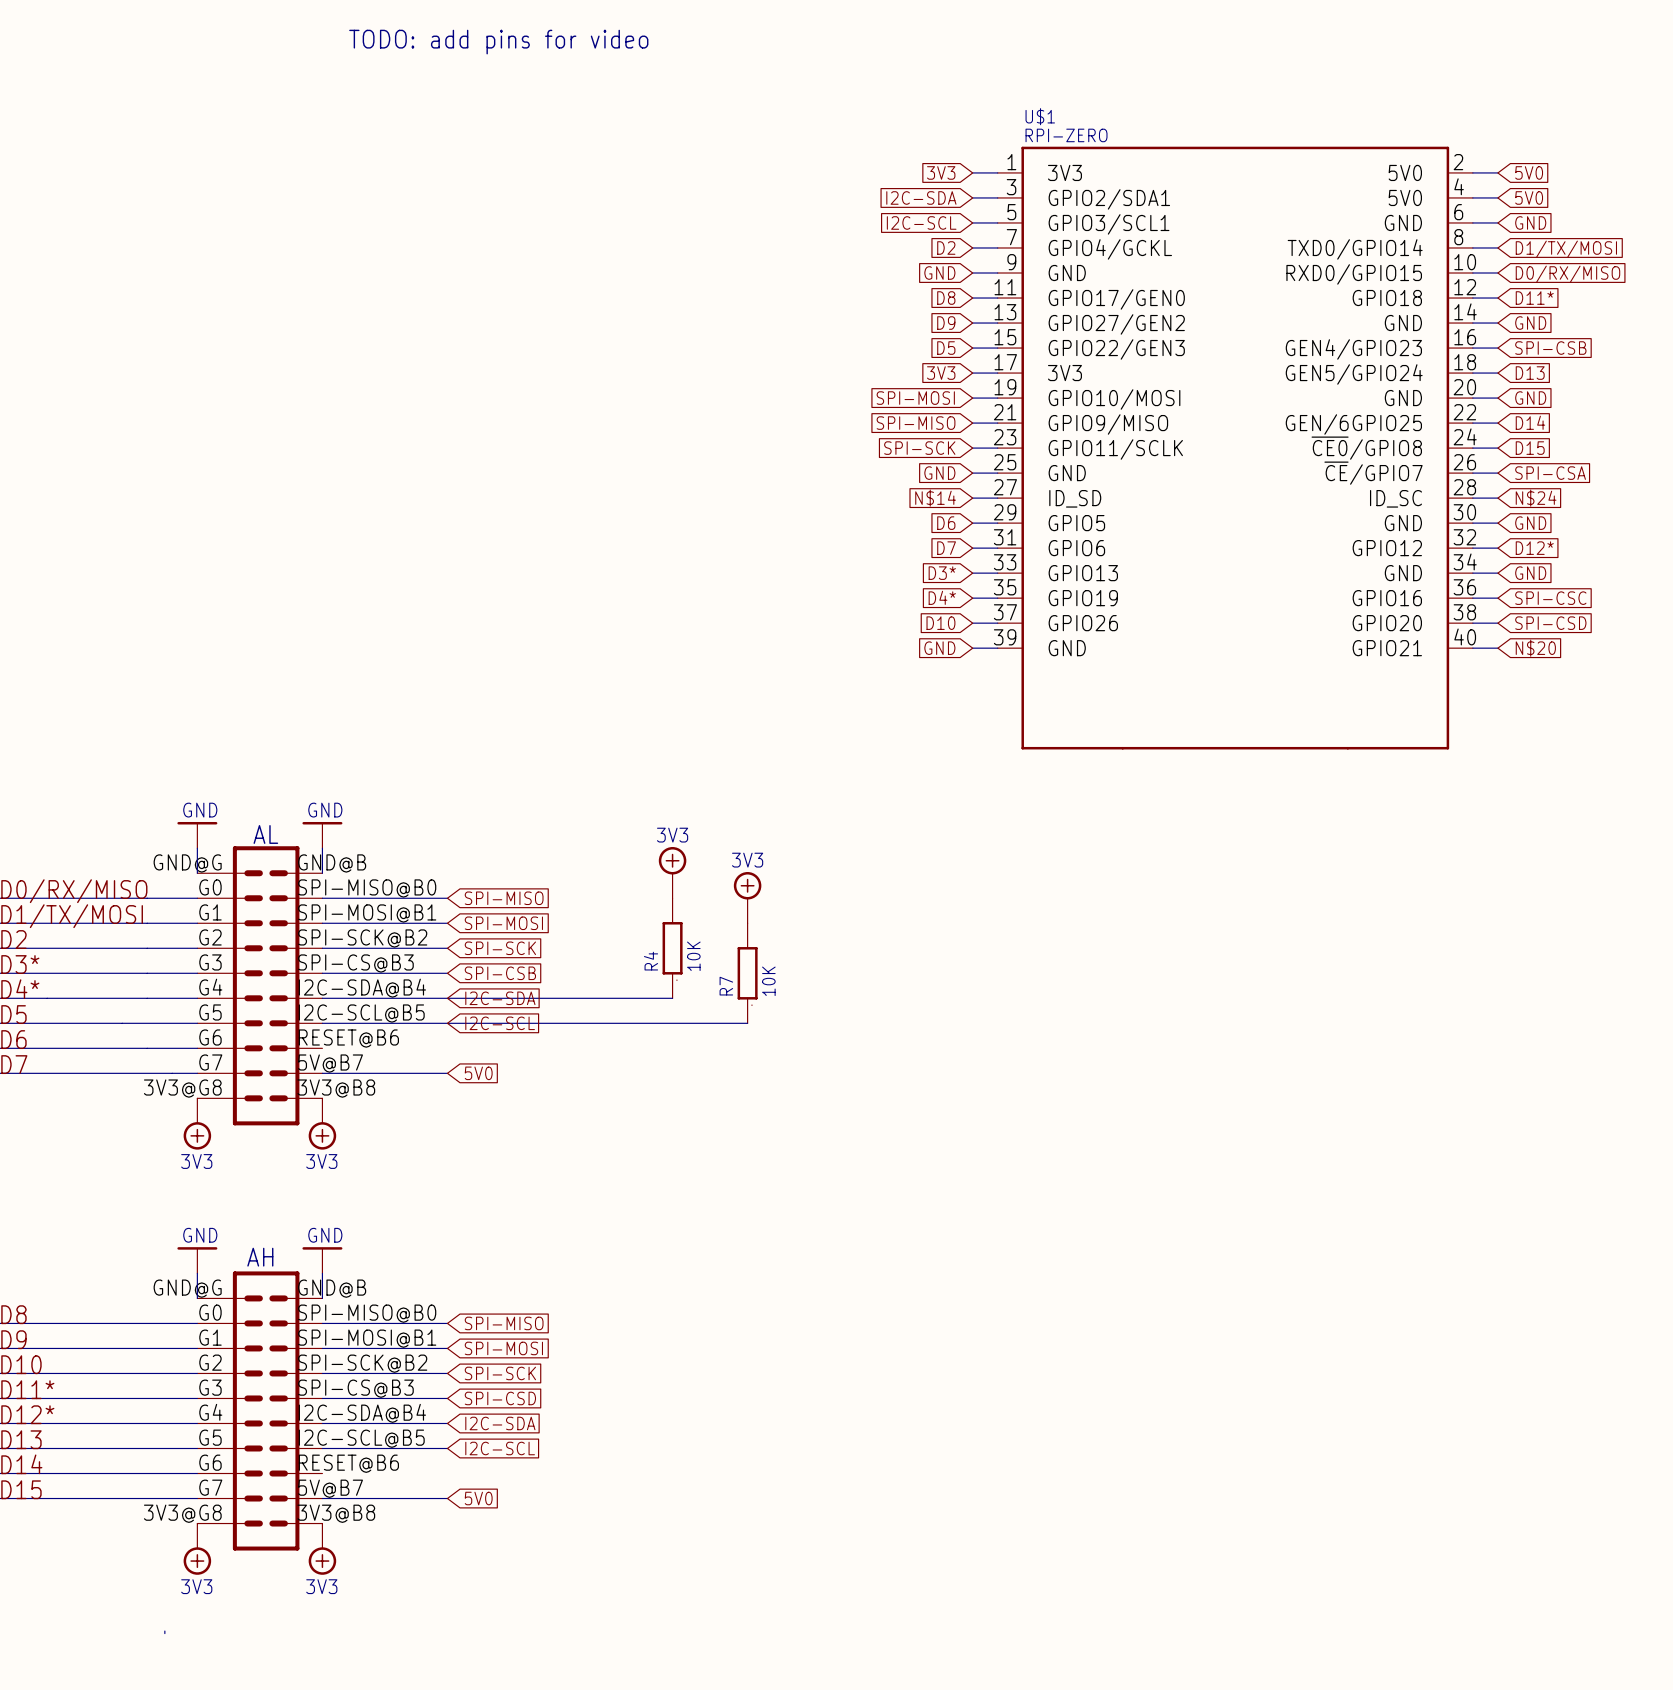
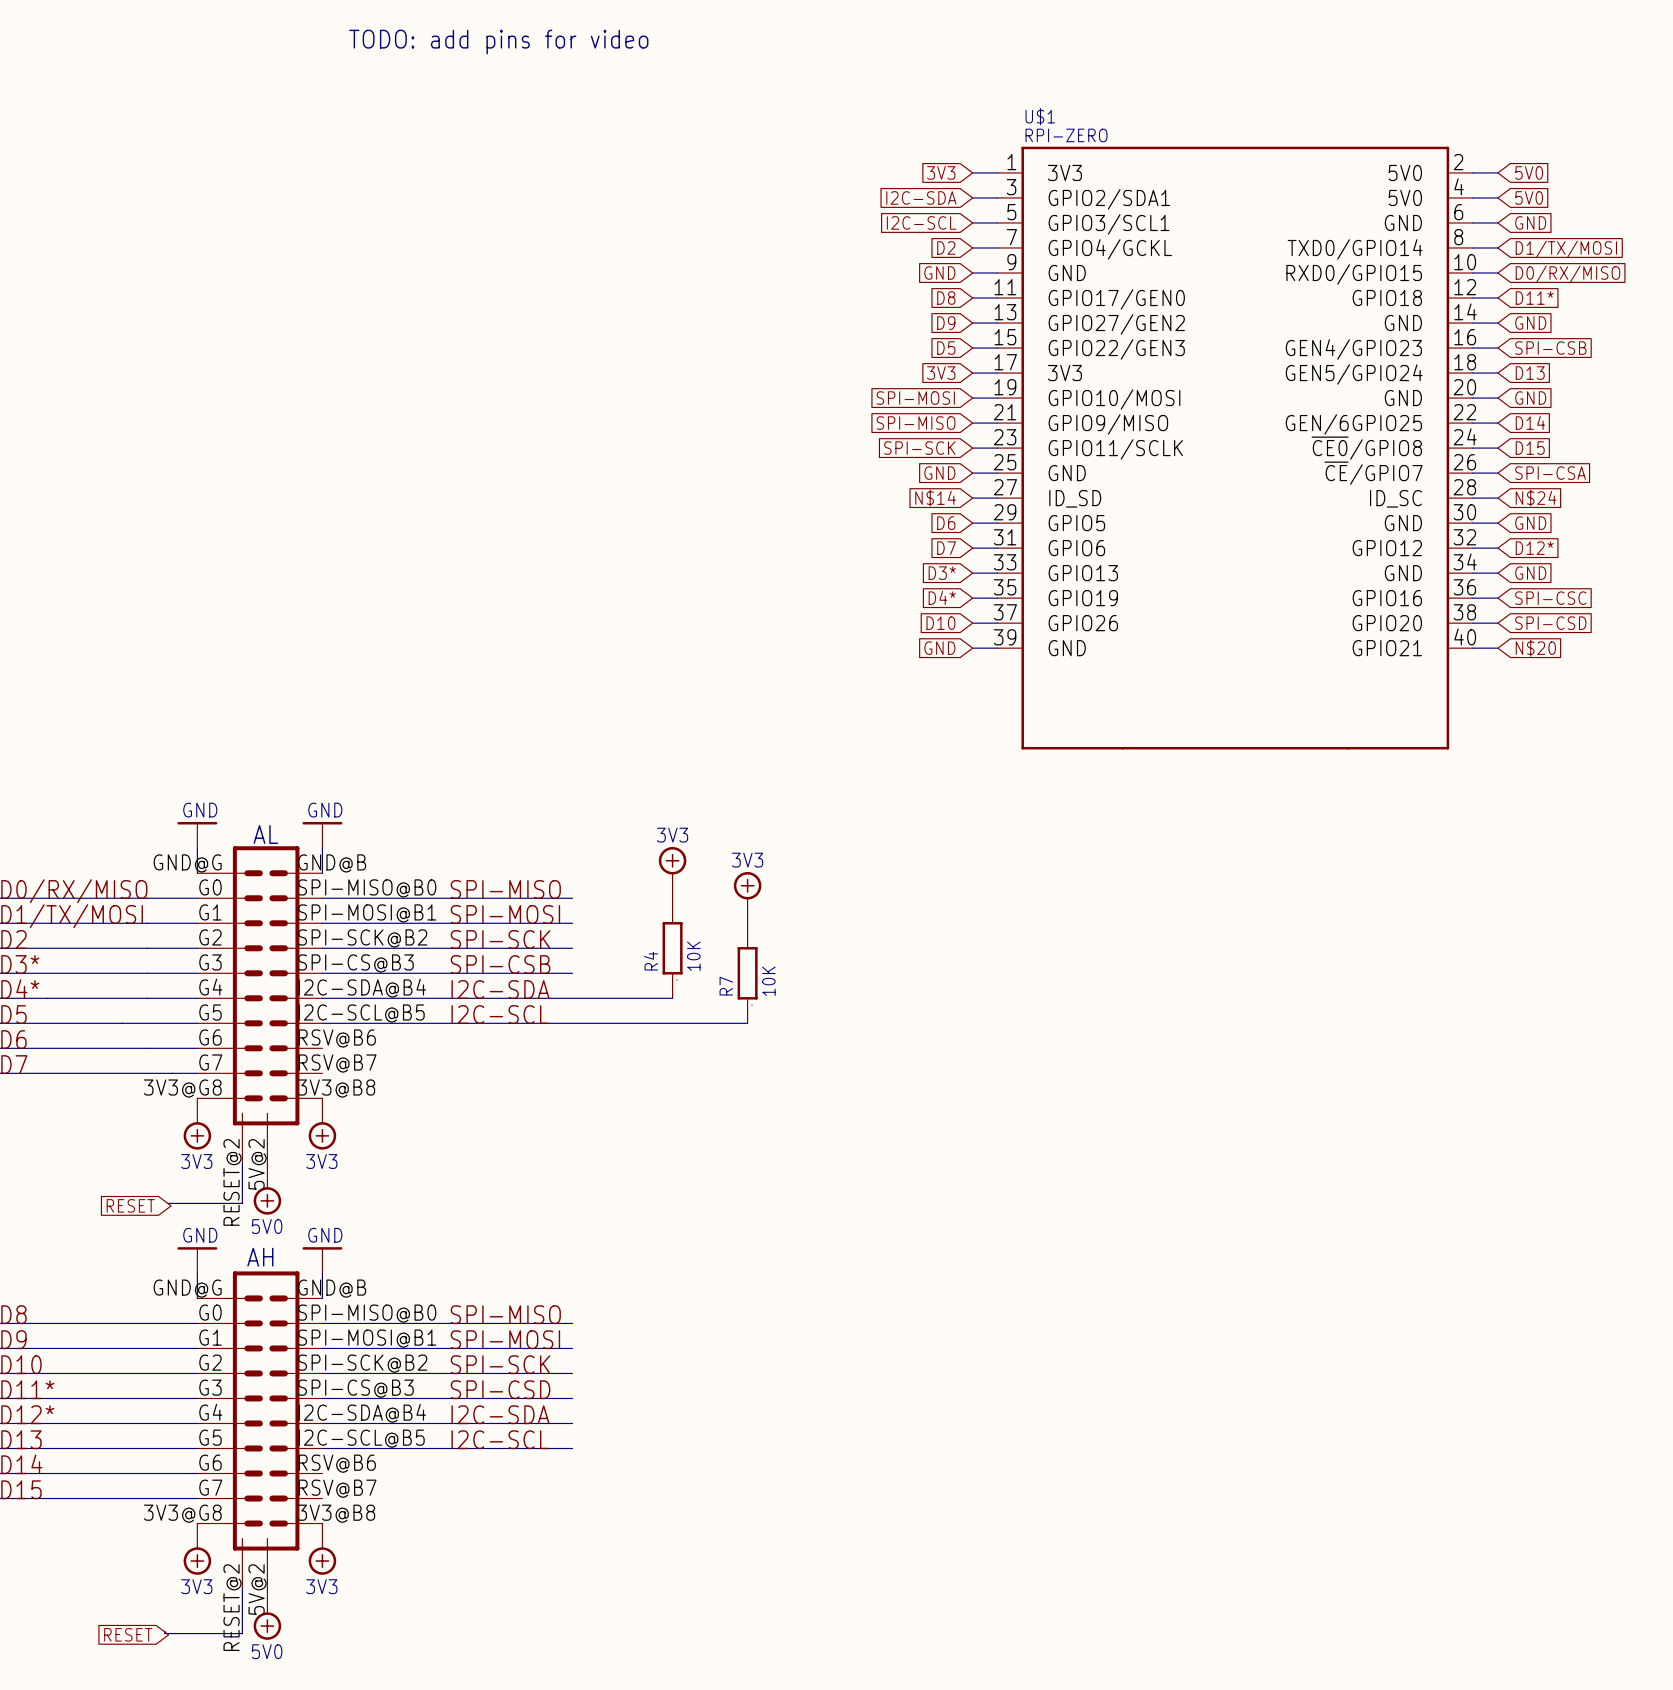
label: none -> SPI-MISO (505, 889)
wire: none -> (447, 898) (572, 898)
global label: SPI-MISO (504, 898) -> none
label: none -> SPI-MOSI (505, 914)
wire: none -> (447, 923) (572, 923)
global label: SPI-MOSI (503, 923) -> none
label: none -> SPI-SCK (500, 939)
wire: none -> (447, 948) (572, 948)
global label: SPI-SCK (500, 948) -> none
label: none -> SPI-CSB (500, 964)
global label: SPI-CSB (500, 973) -> none
AL: (259, 985) -> none
label: none -> I2C-SDA (500, 989)
global label: I2C-SDA (500, 998) -> none
AL: none -> (259, 1004)
label: none -> I2C-SCL (500, 1014)
global label: I2C-SCL (500, 1023) -> none
wire: (322, 1073) (447, 1073) -> (447, 973) (572, 973)
global label: 5V0 (478, 1073) -> none
wire: none -> (242, 1163) (242, 1203) (167, 1203)
power symbol: none -> 5V0 (267, 1189)
global label: none -> RESET (130, 1205)
label: none -> SPI-MISO (505, 1314)
wire: none -> (447, 1323) (572, 1323)
global label: SPI-MISO (504, 1323) -> none
label: none -> SPI-MOSI (505, 1339)
wire: none -> (447, 1348) (572, 1348)
global label: SPI-MOSI (503, 1348) -> none
label: none -> SPI-SCK (500, 1364)
wire: none -> (447, 1373) (572, 1373)
global label: SPI-SCK (500, 1373) -> none
label: none -> SPI-CSD (500, 1389)
global label: SPI-CSD (500, 1398) -> none
AH: (259, 1410) -> none
label: none -> I2C-SDA (500, 1414)
wire: none -> (447, 1423) (572, 1423)
global label: I2C-SDA (500, 1423) -> none
AH: none -> (259, 1429)
label: none -> I2C-SCL (500, 1439)
wire: none -> (447, 1448) (572, 1448)
global label: I2C-SCL (500, 1448) -> none
wire: (322, 1498) (447, 1498) -> (447, 1398) (572, 1398)
global label: 5V0 (478, 1498) -> none
wire: none -> (242, 1588) (242, 1633) (164, 1633)
power symbol: none -> 5V0 (267, 1614)
global label: none -> RESET (128, 1634)

